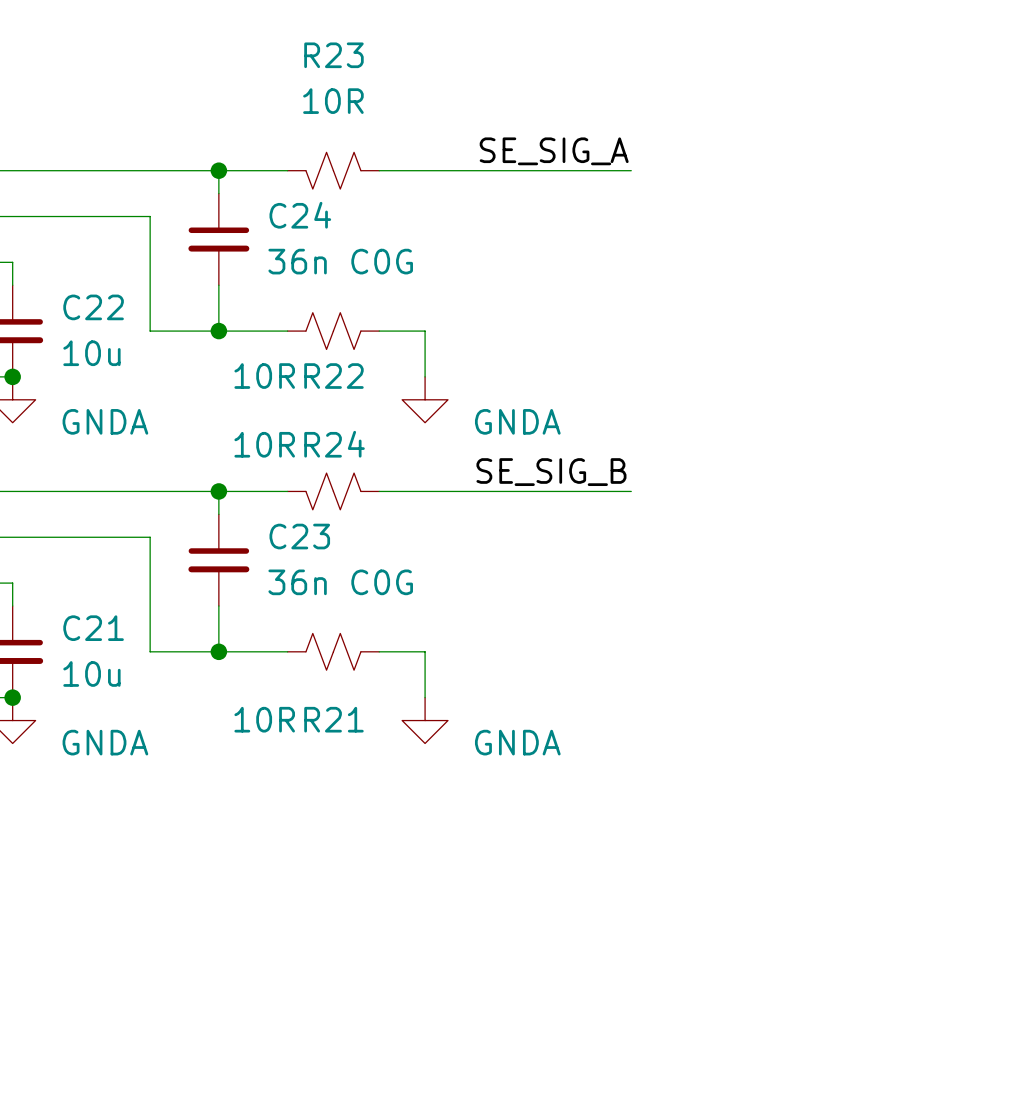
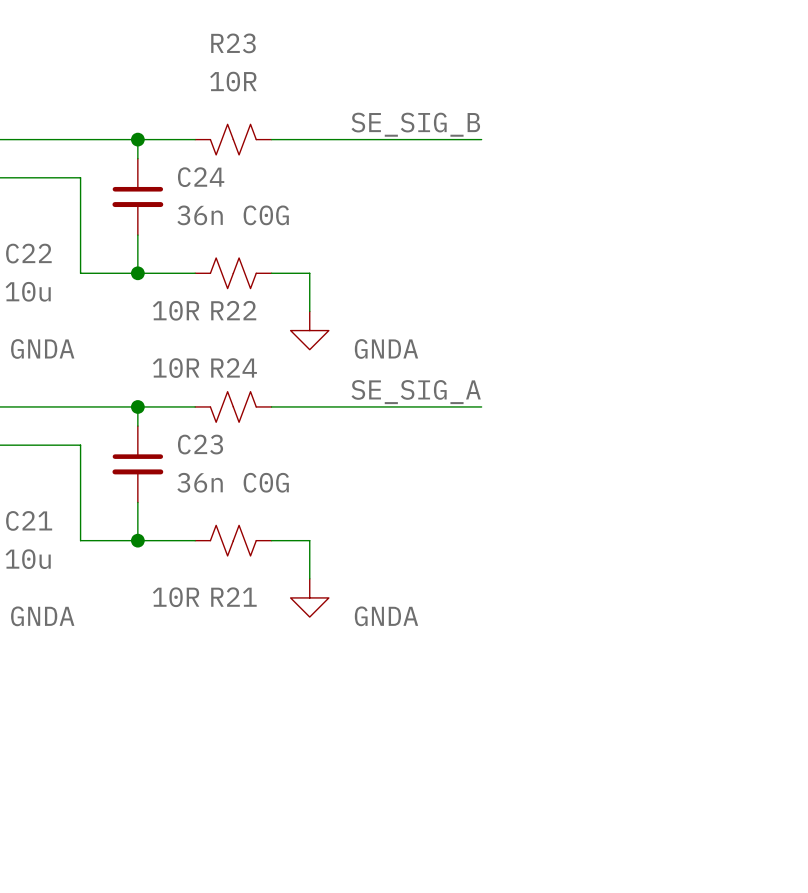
label: SE_SIG_A (554, 151) -> SE_SIG_B (415, 124)
label: SE_SIG_B (551, 472) -> SE_SIG_A (416, 392)

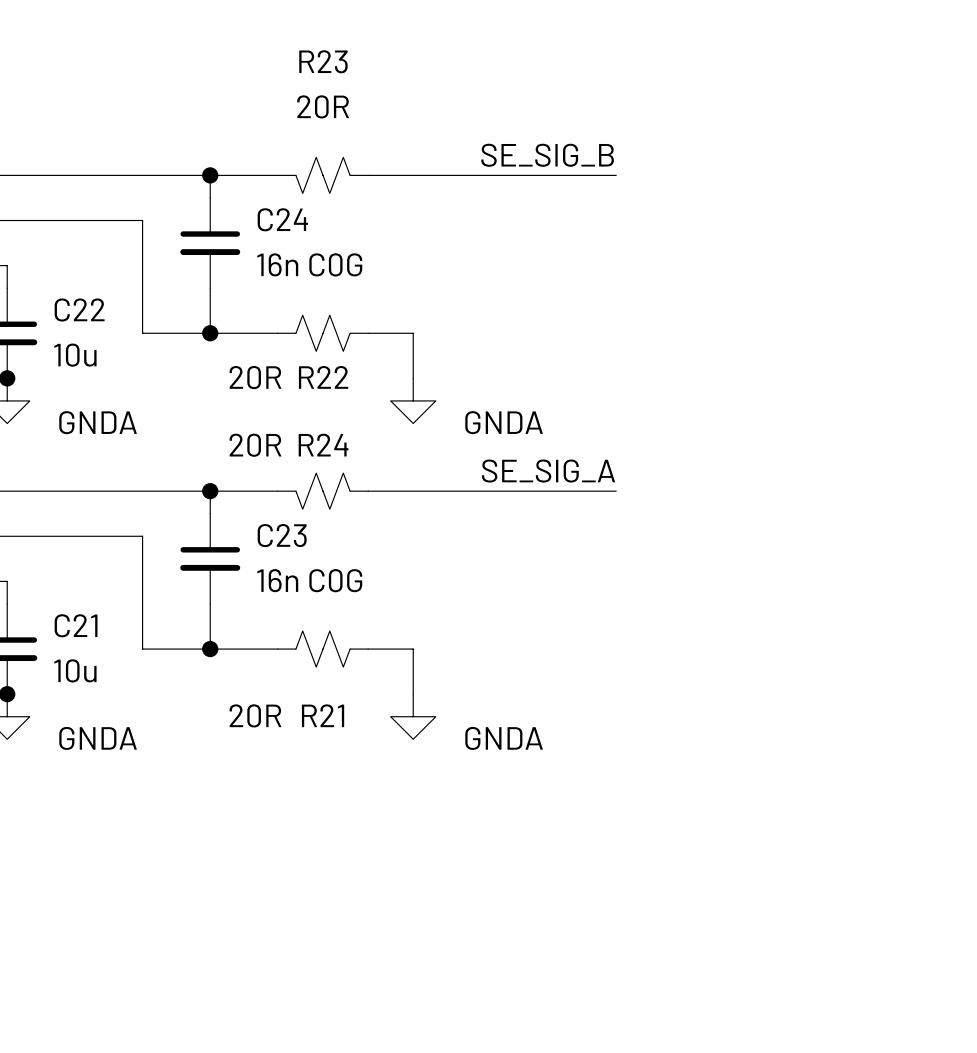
R23 value: 10R (233, 81) -> 20R (323, 106)
C24 value: 36n C0G (233, 215) -> 16n C0G (309, 264)
R24 value: 10R (176, 310) -> 20R (255, 377)
R22 value: 10R (176, 368) -> 20R (255, 445)
C23 value: 36n C0G (233, 482) -> 16n C0G (309, 580)
R21 value: 10R (176, 597) -> 20R (255, 715)

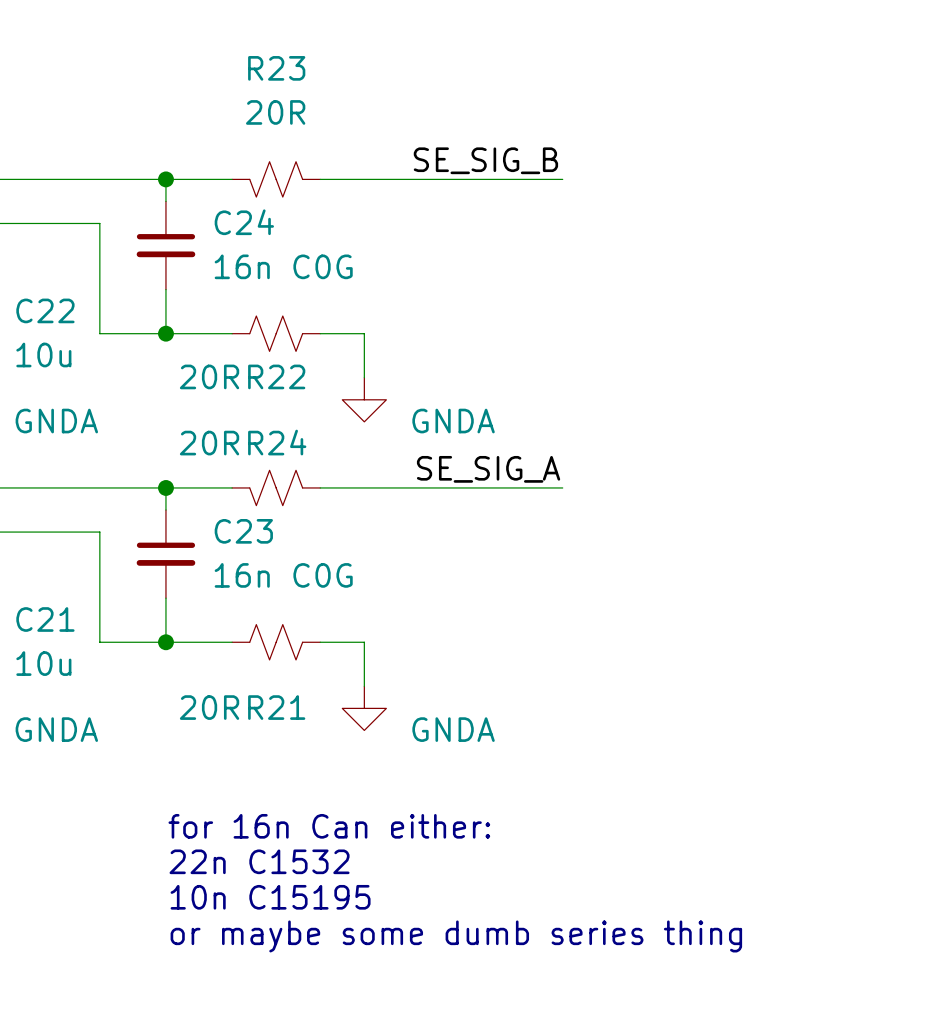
text: none -> for 16n Can either: (329, 826)
text: none -> 22n C1532 (259, 861)
text: none -> 10n C15195 (270, 897)
text: none -> or maybe some dumb series thing (456, 936)

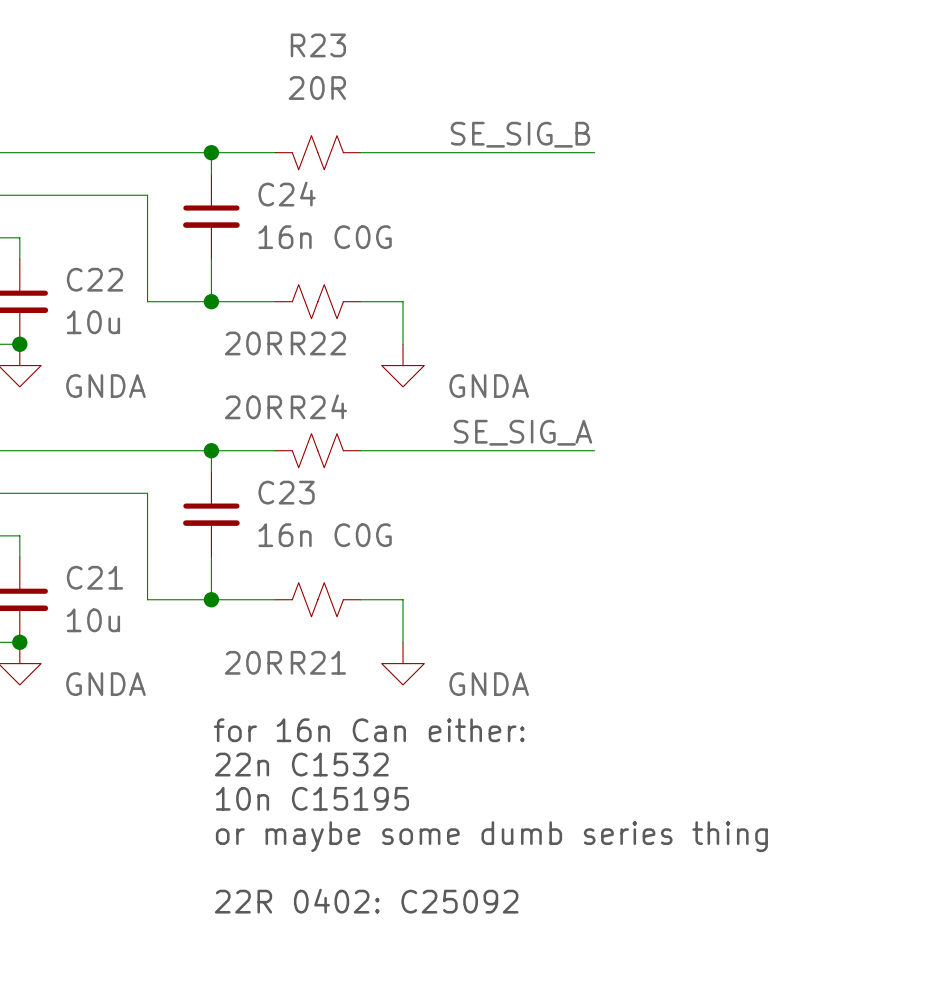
text position: for 16n Can either: (329, 826) -> for 16n Can either: (369, 730)
text position: 22n C1532 (259, 861) -> 22n C1532 (301, 764)
text position: 10n C15195 (270, 897) -> 10n C15195 (312, 798)
text position: or maybe some dumb series thing (456, 936) -> or maybe some dumb series thing (491, 836)
text: none -> 22R 0402: C25092 (366, 901)

